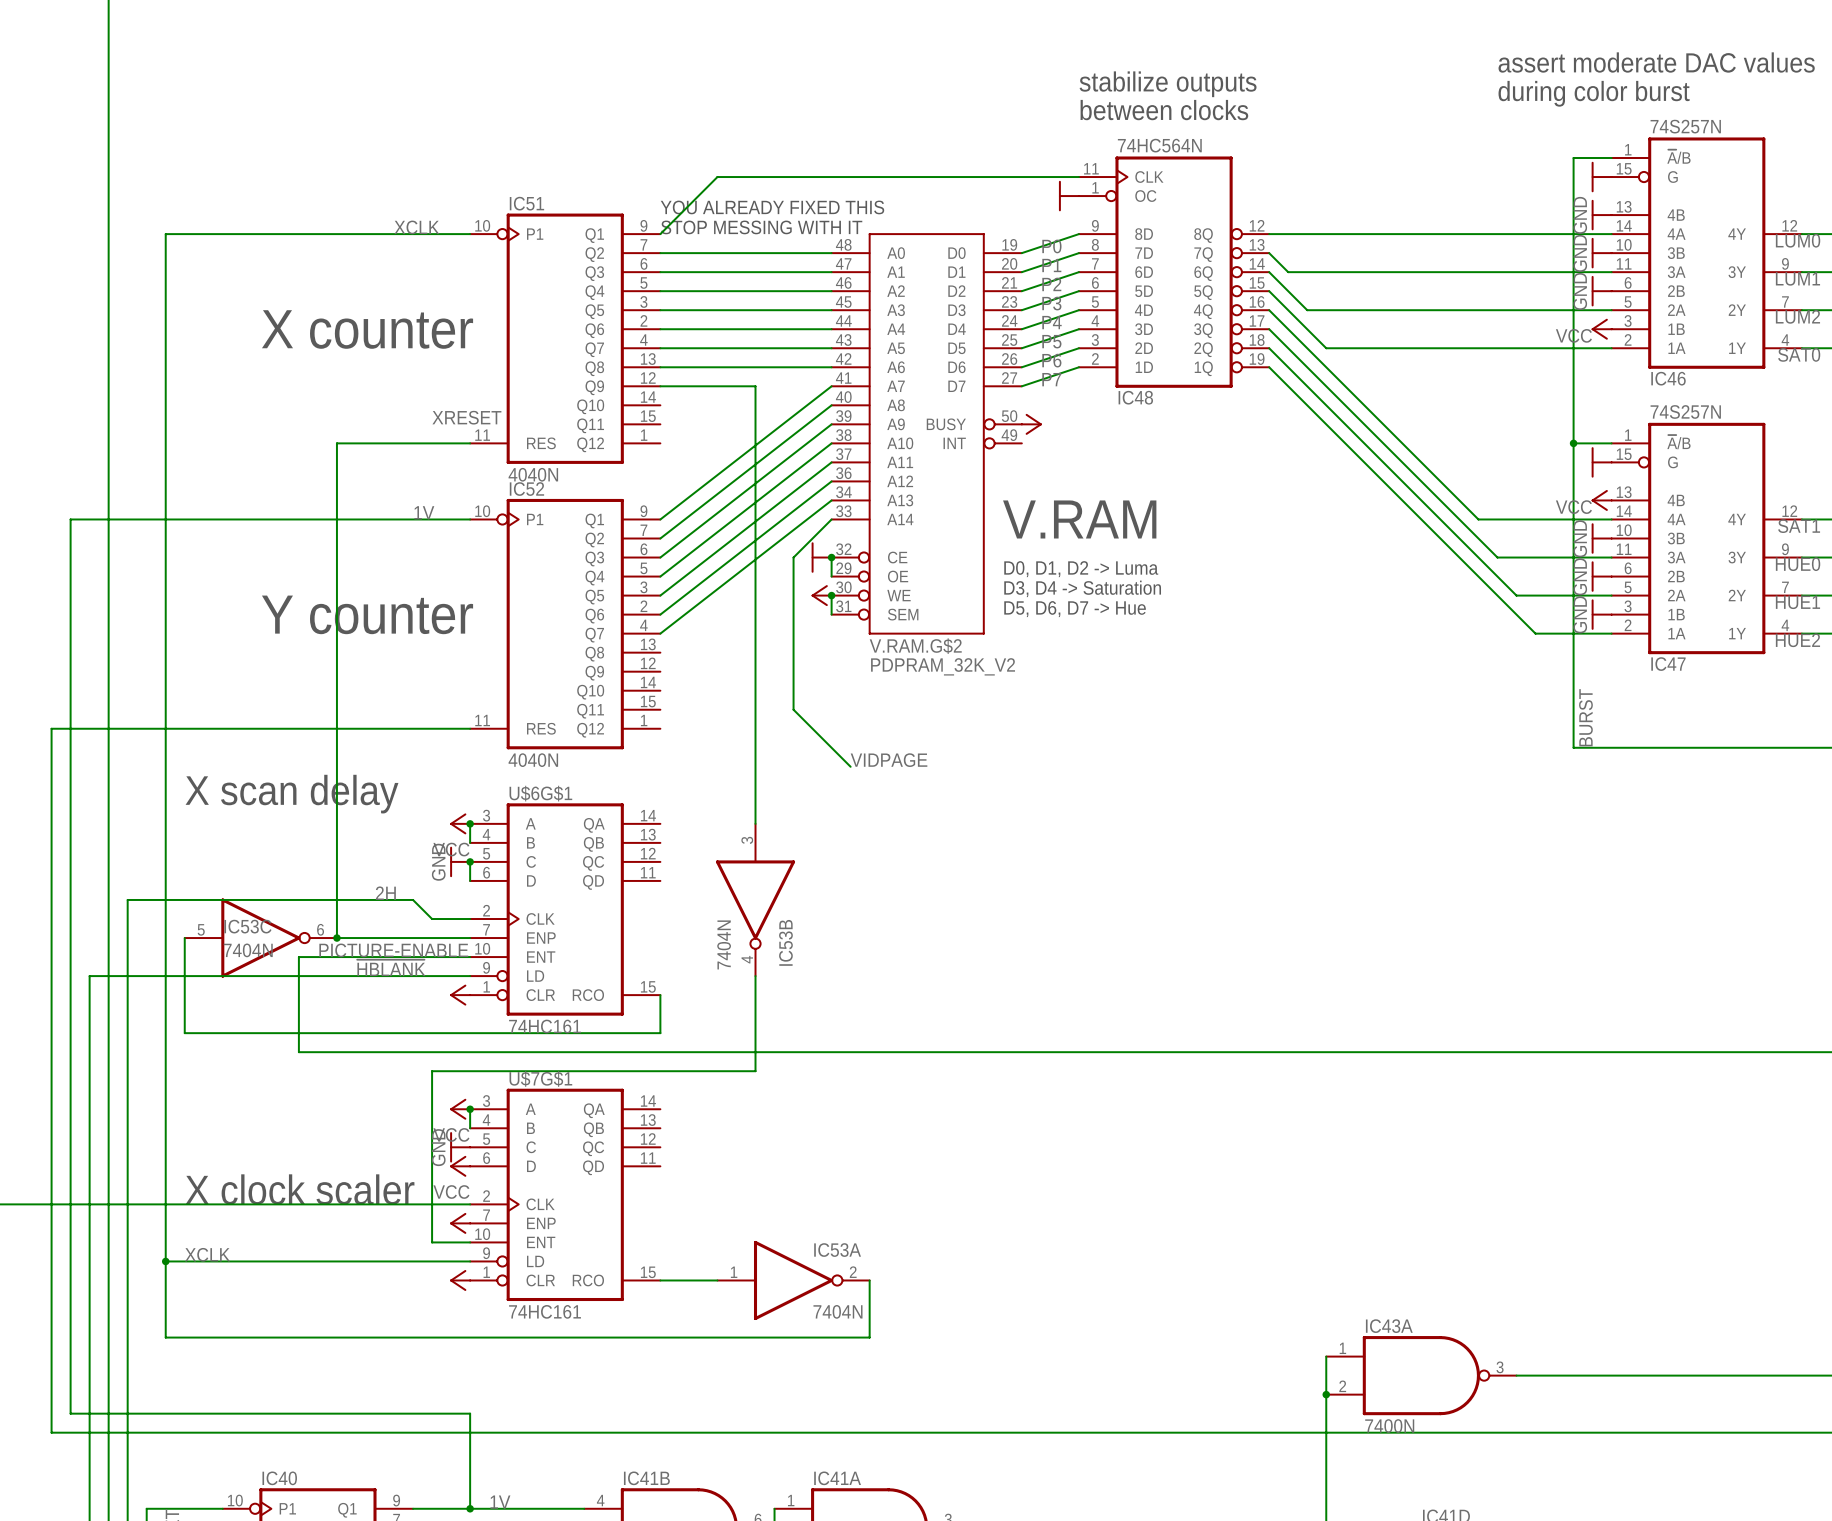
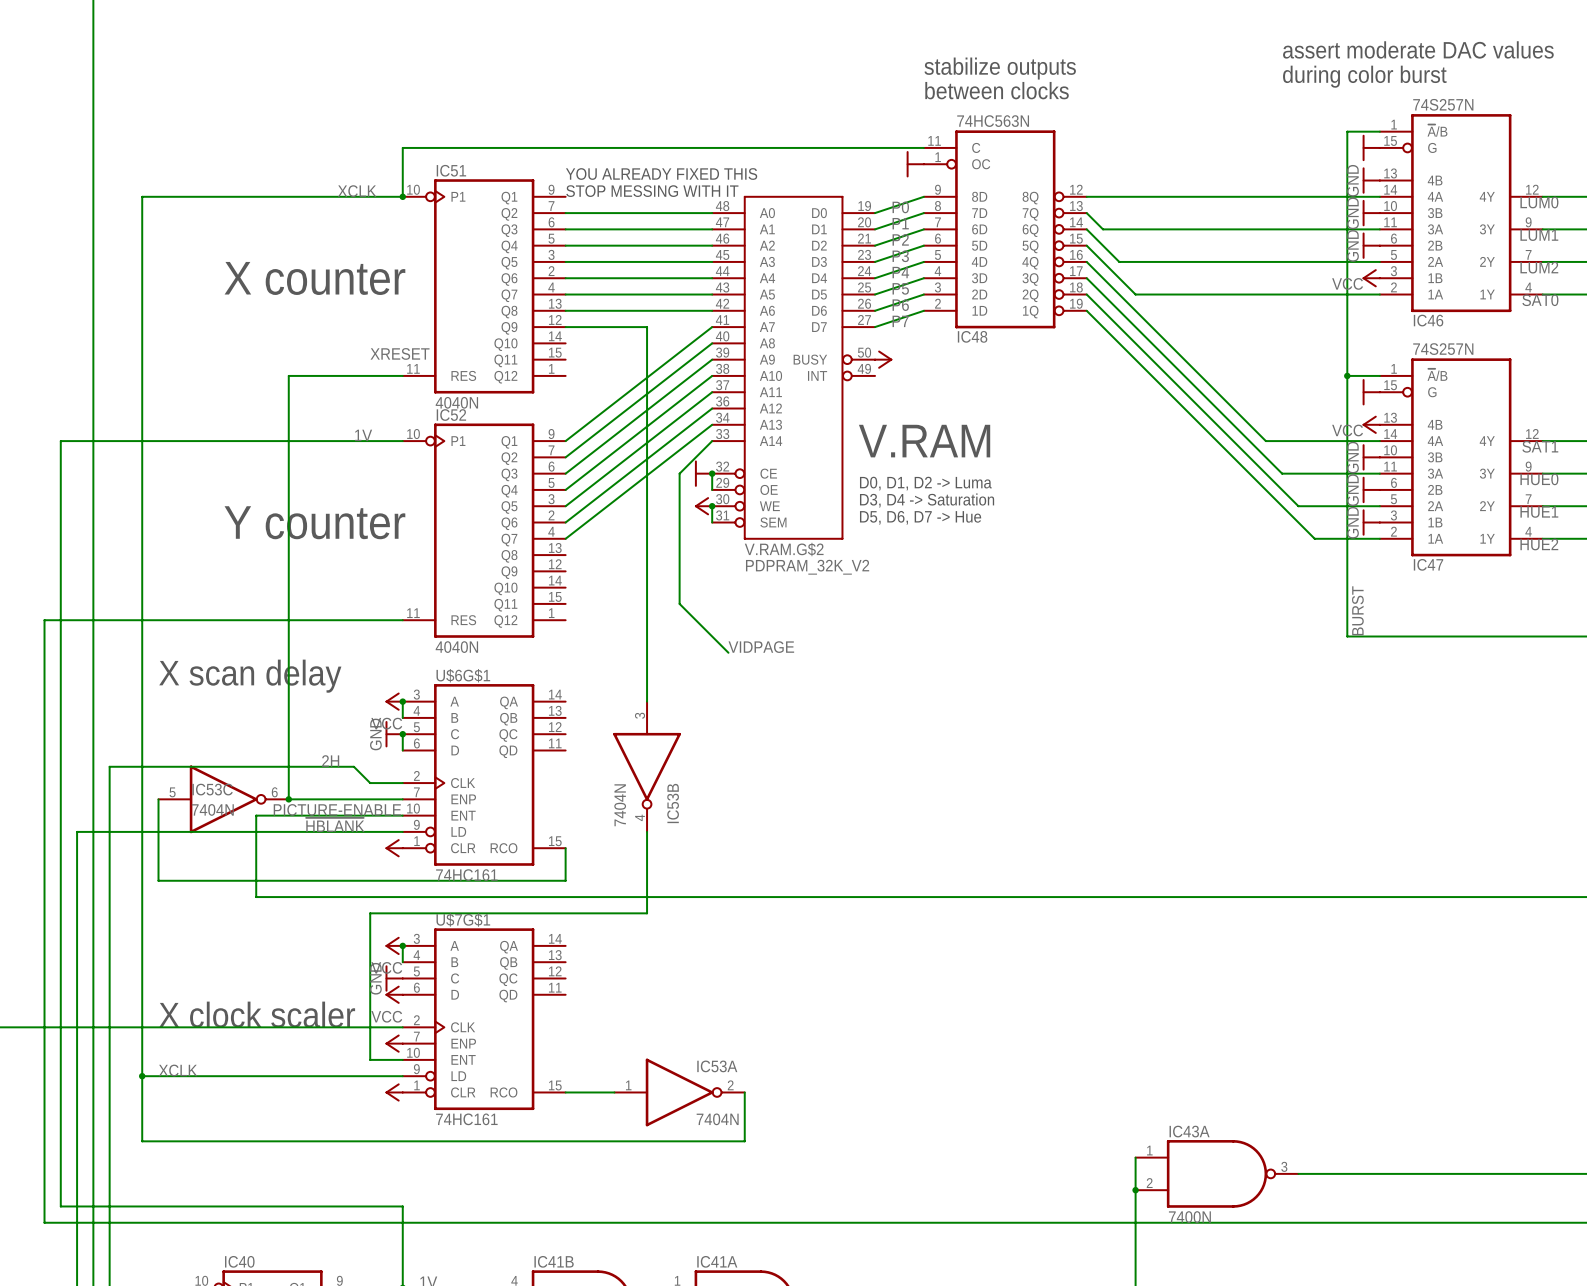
IC48 value: 74HC564N (1159, 145) -> 74HC563N (993, 121)
IC48 symbol: [1078, 156, 1270, 388] -> [923, 130, 1087, 329]
wire: (717, 177) (660, 234) -> (614, 147) (402, 147) (402, 196)
junction: none -> (402, 196)

